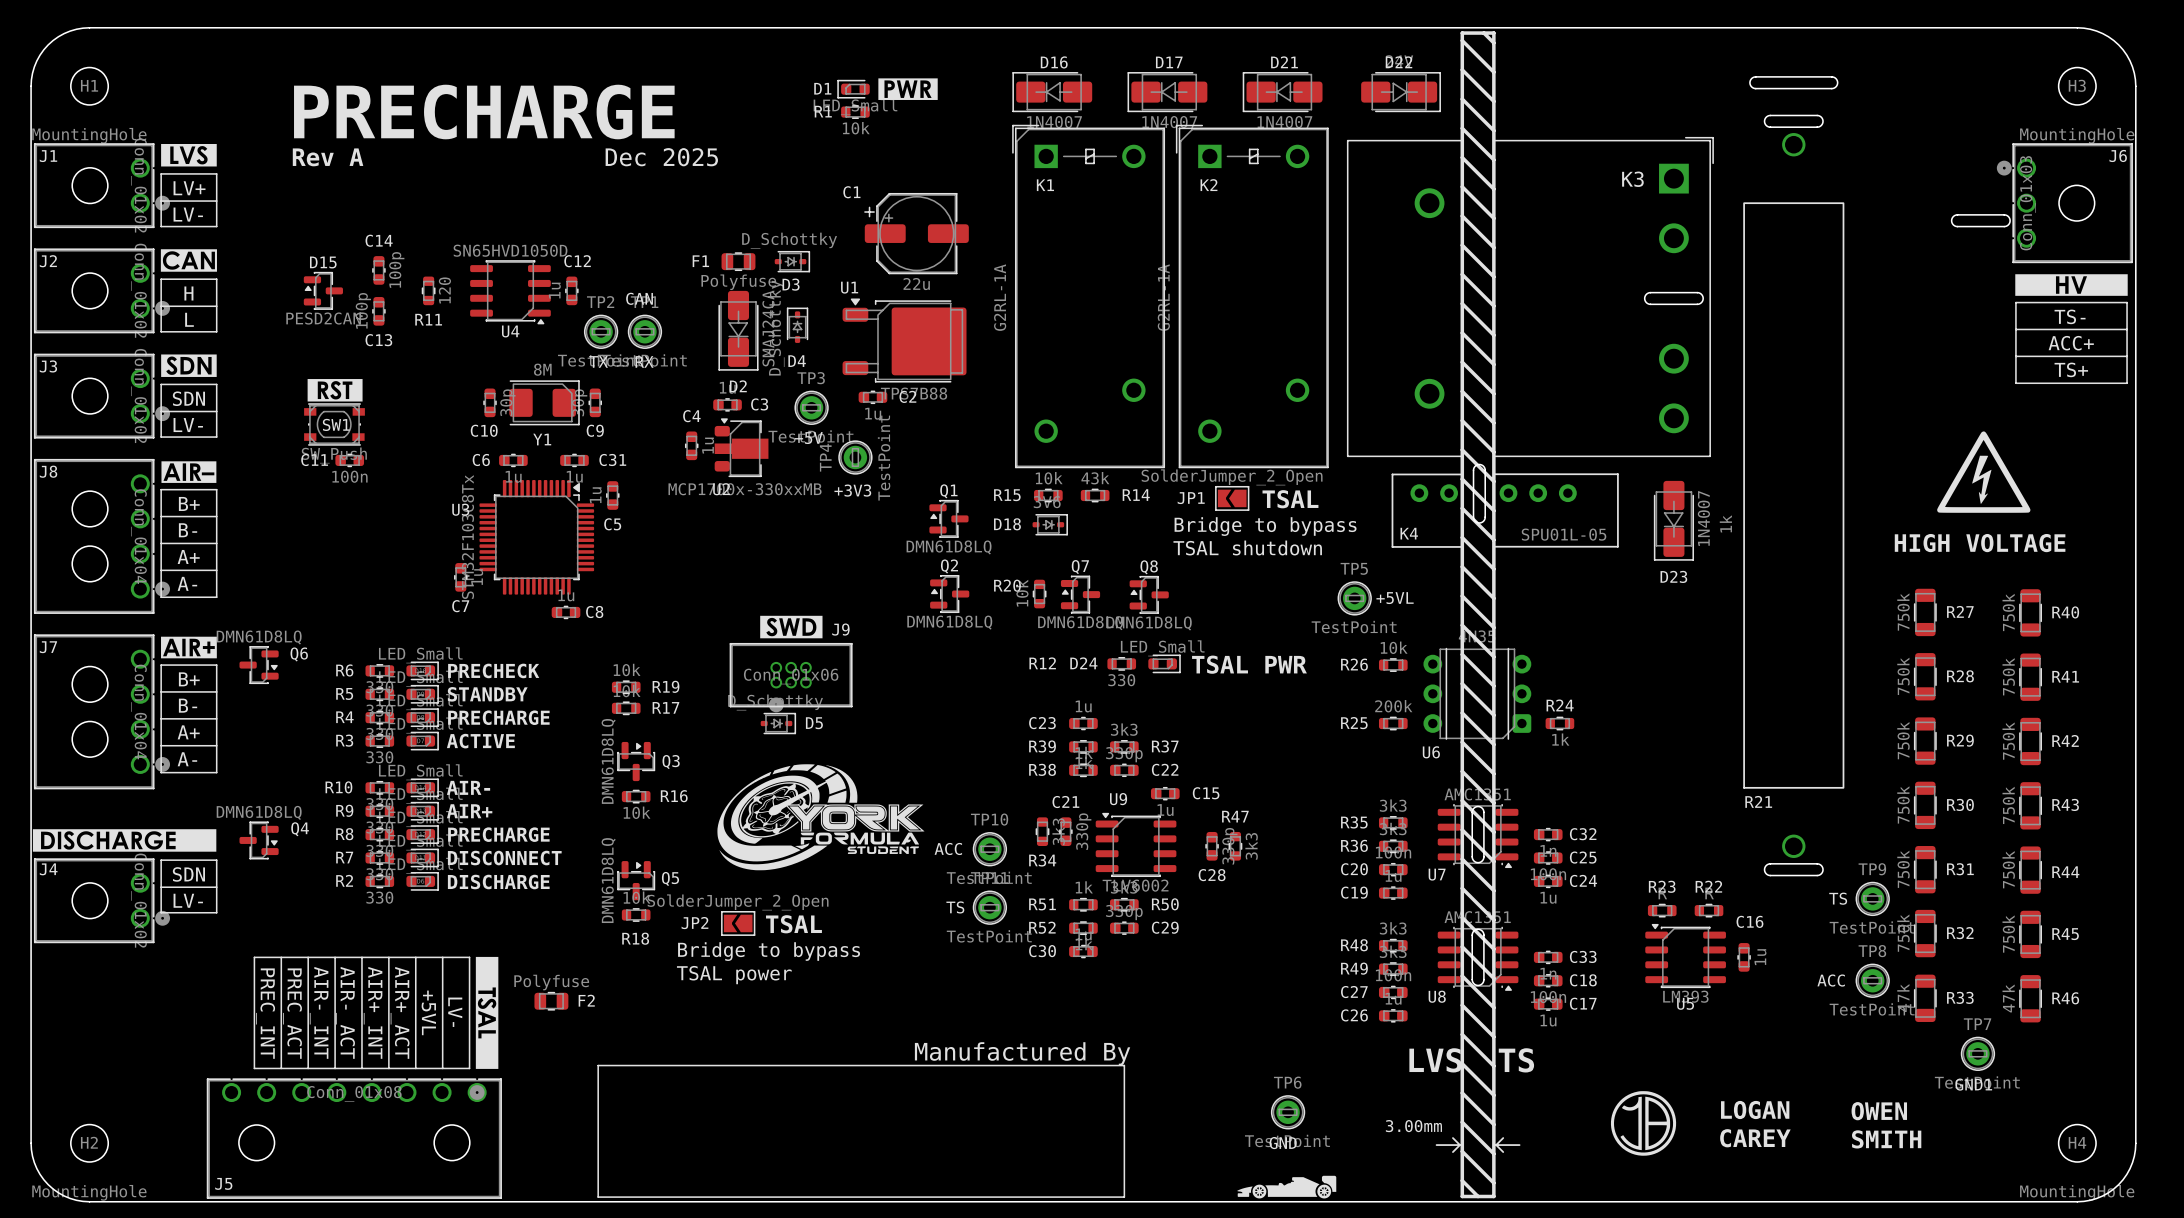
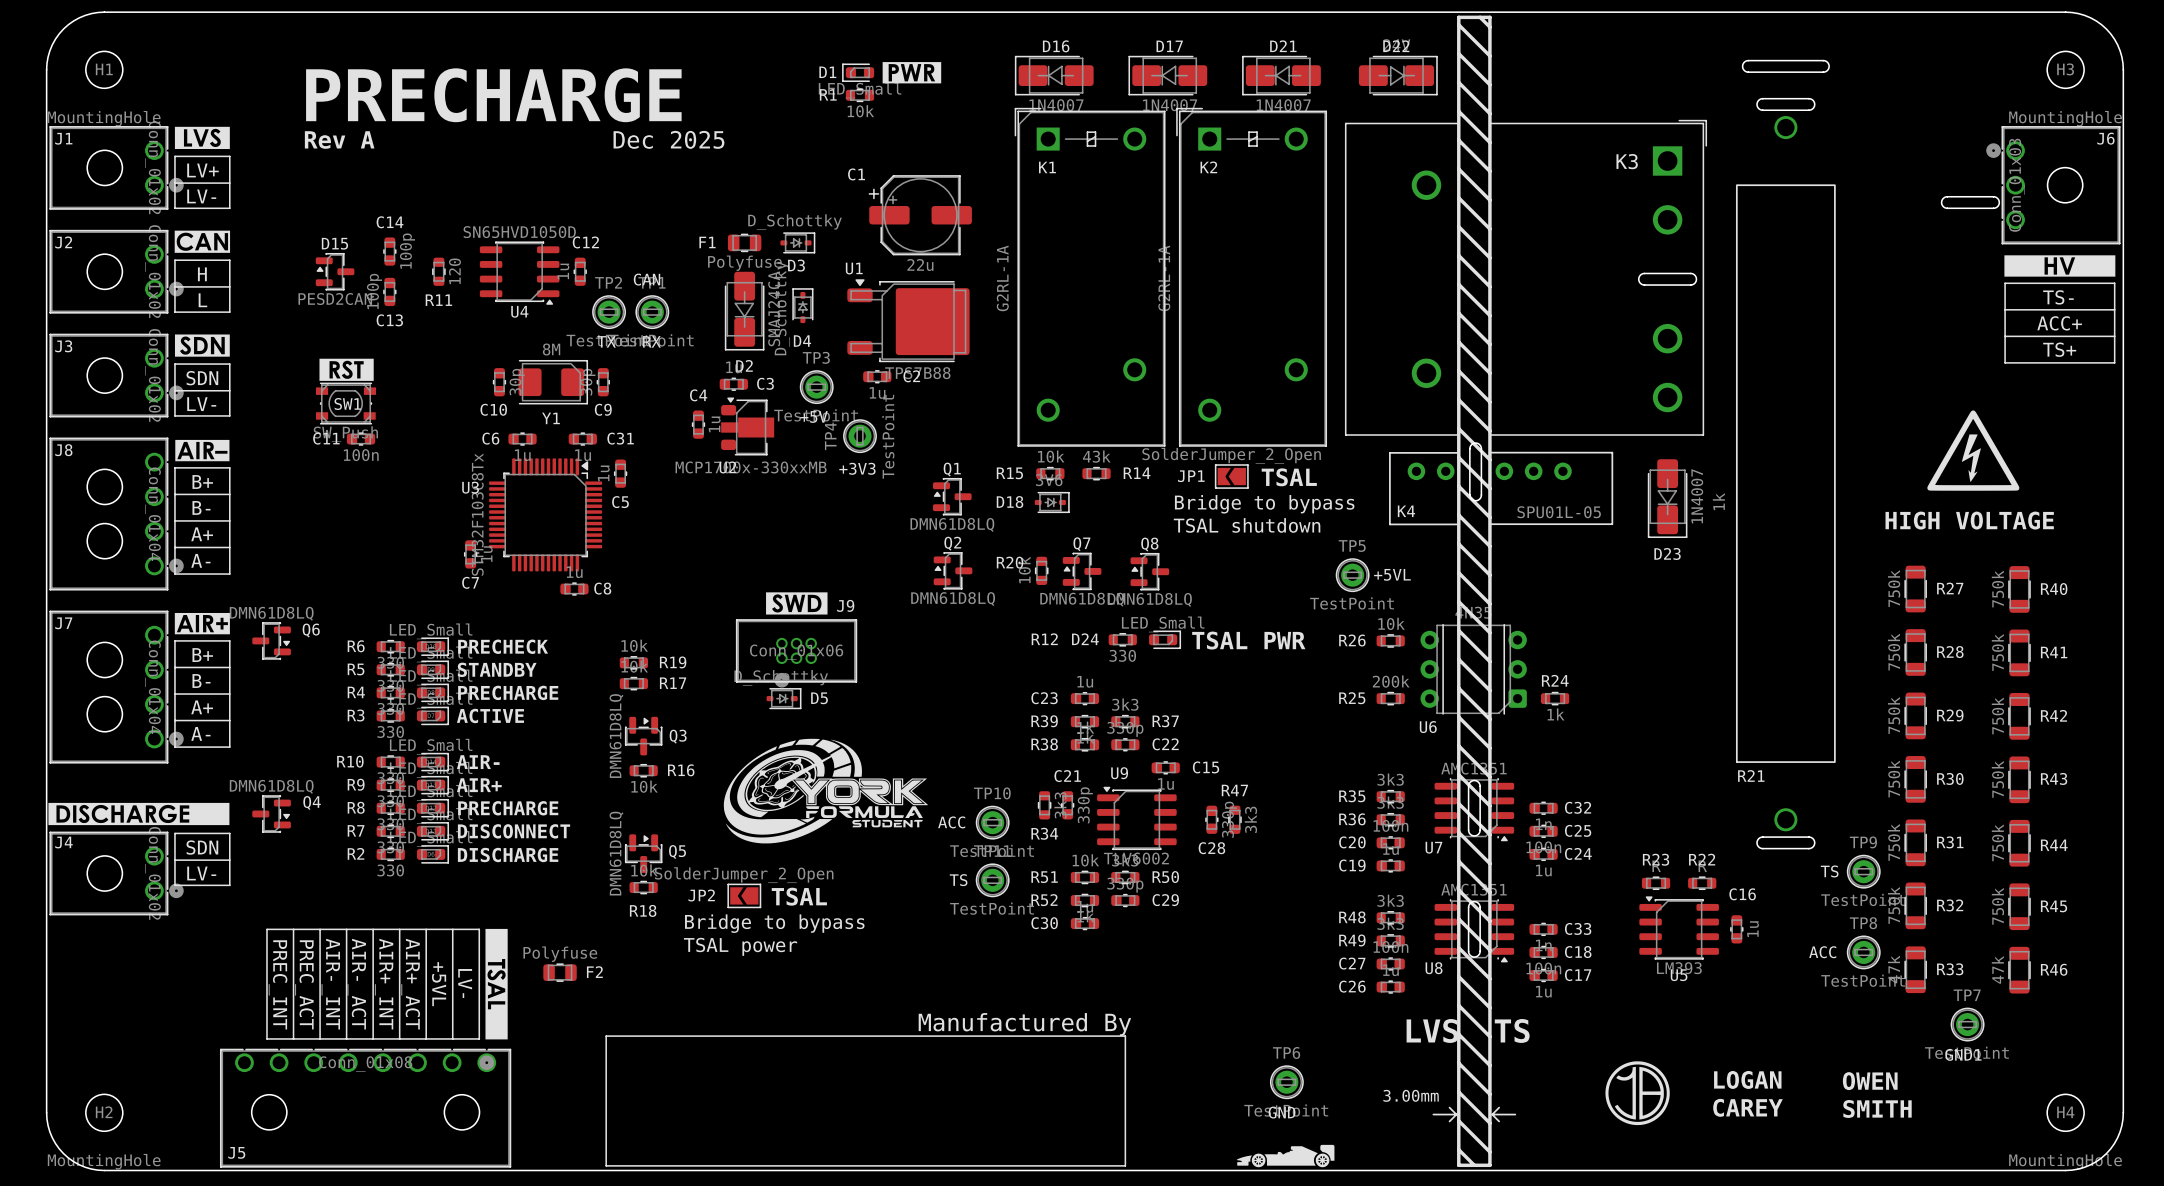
R51 value: 1k (1084, 887) -> 10k (1085, 860)

